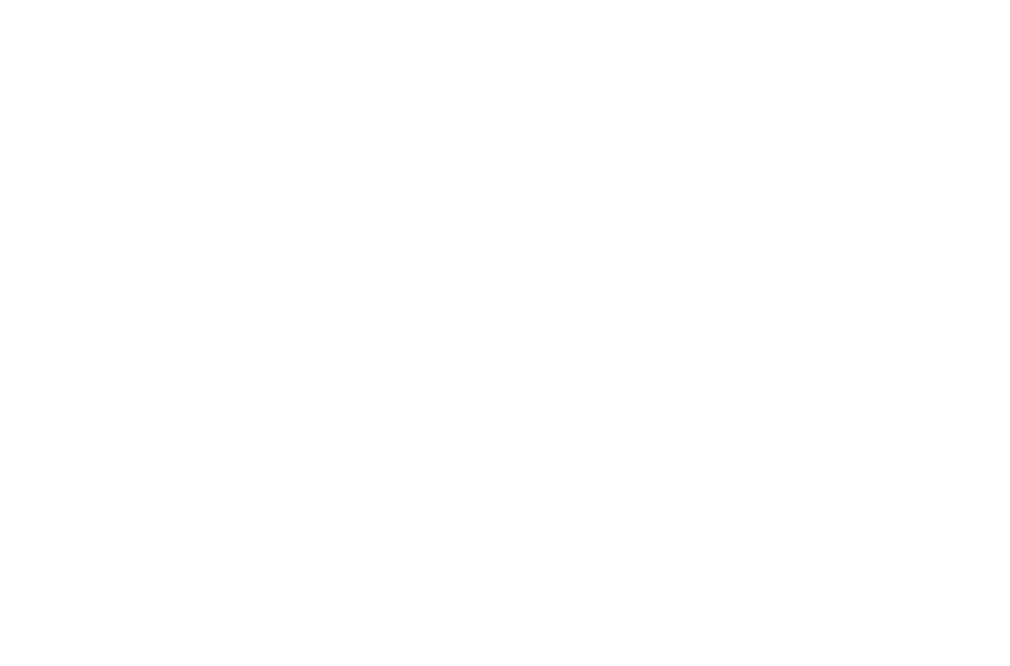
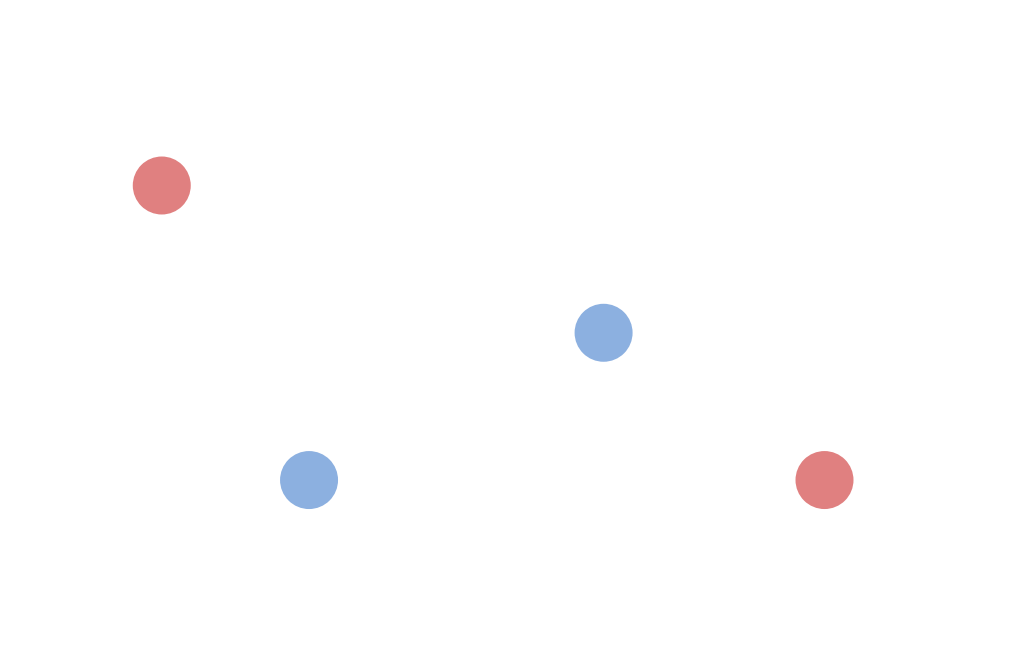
part: none -> (161, 185)
part: none -> (603, 332)
part: none -> (309, 480)
part: none -> (824, 480)

